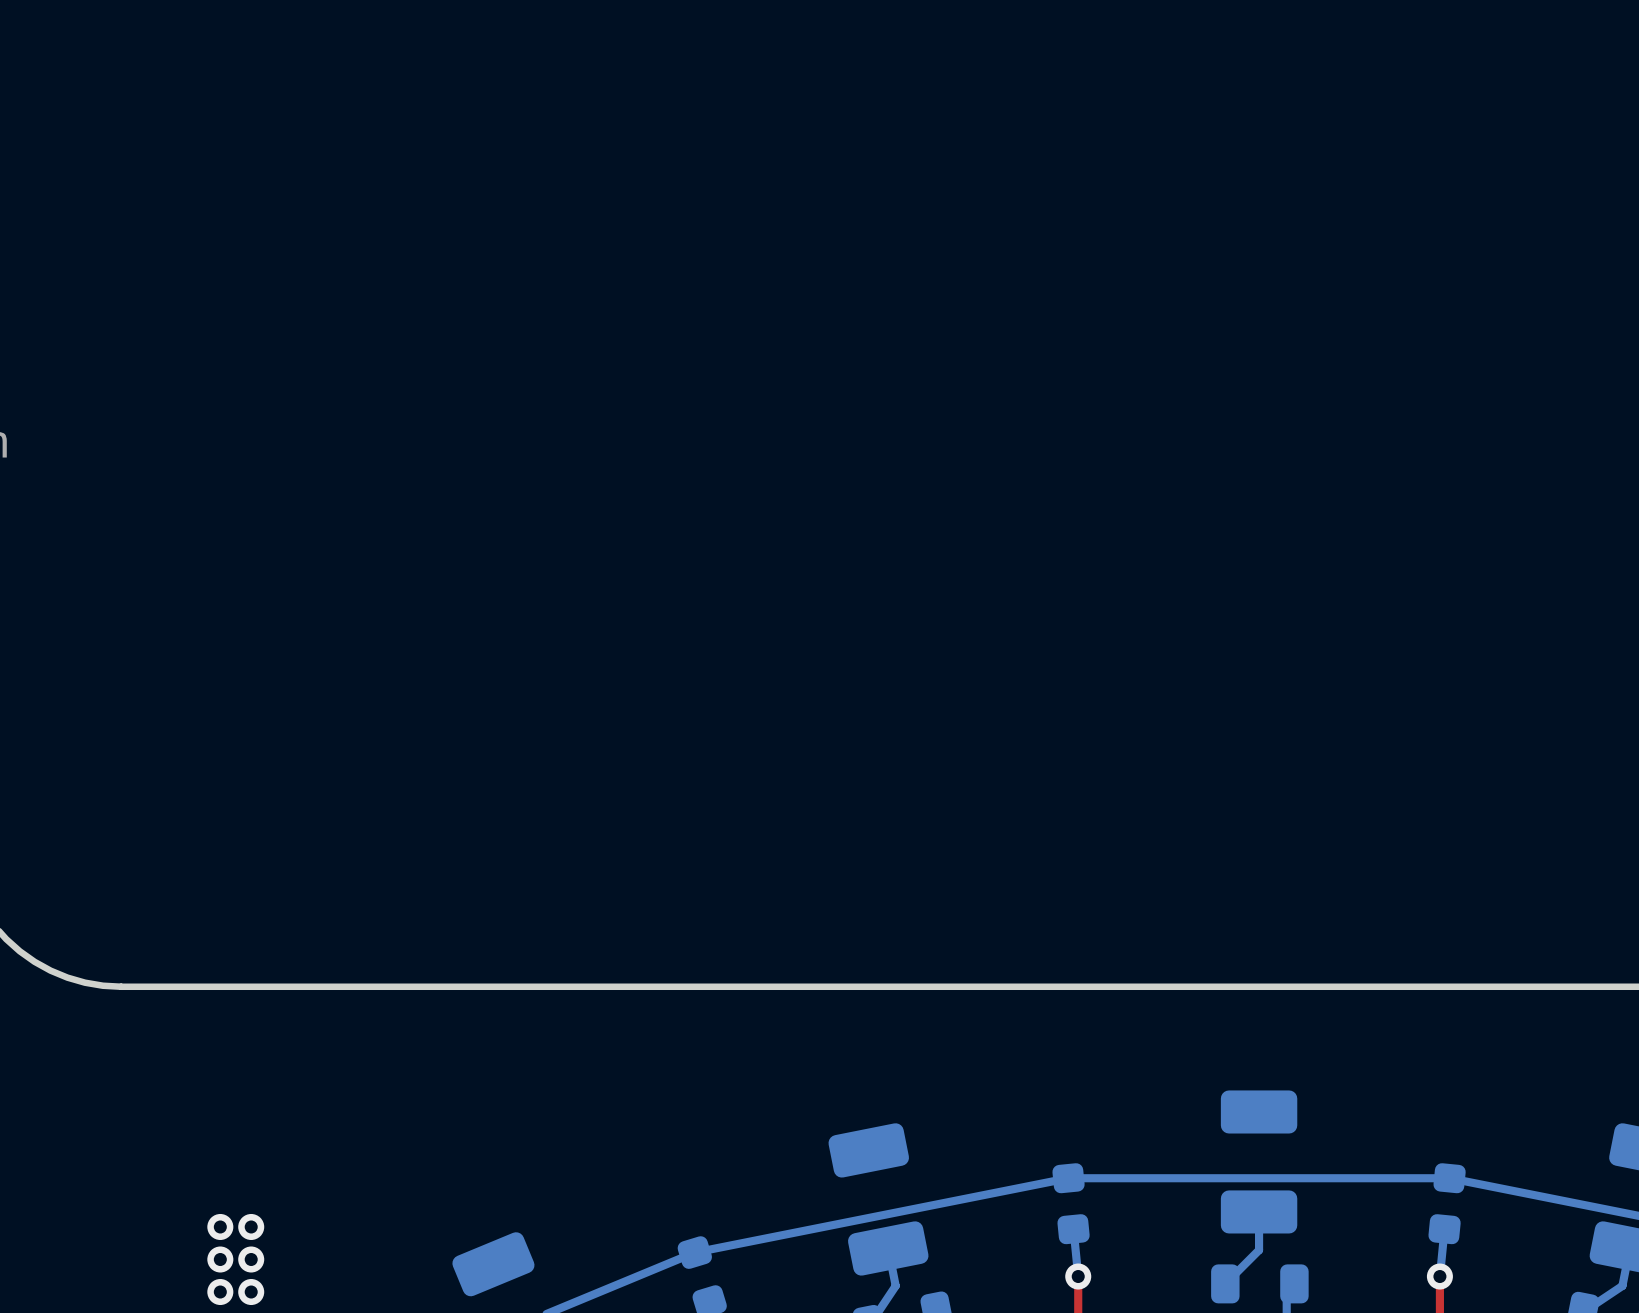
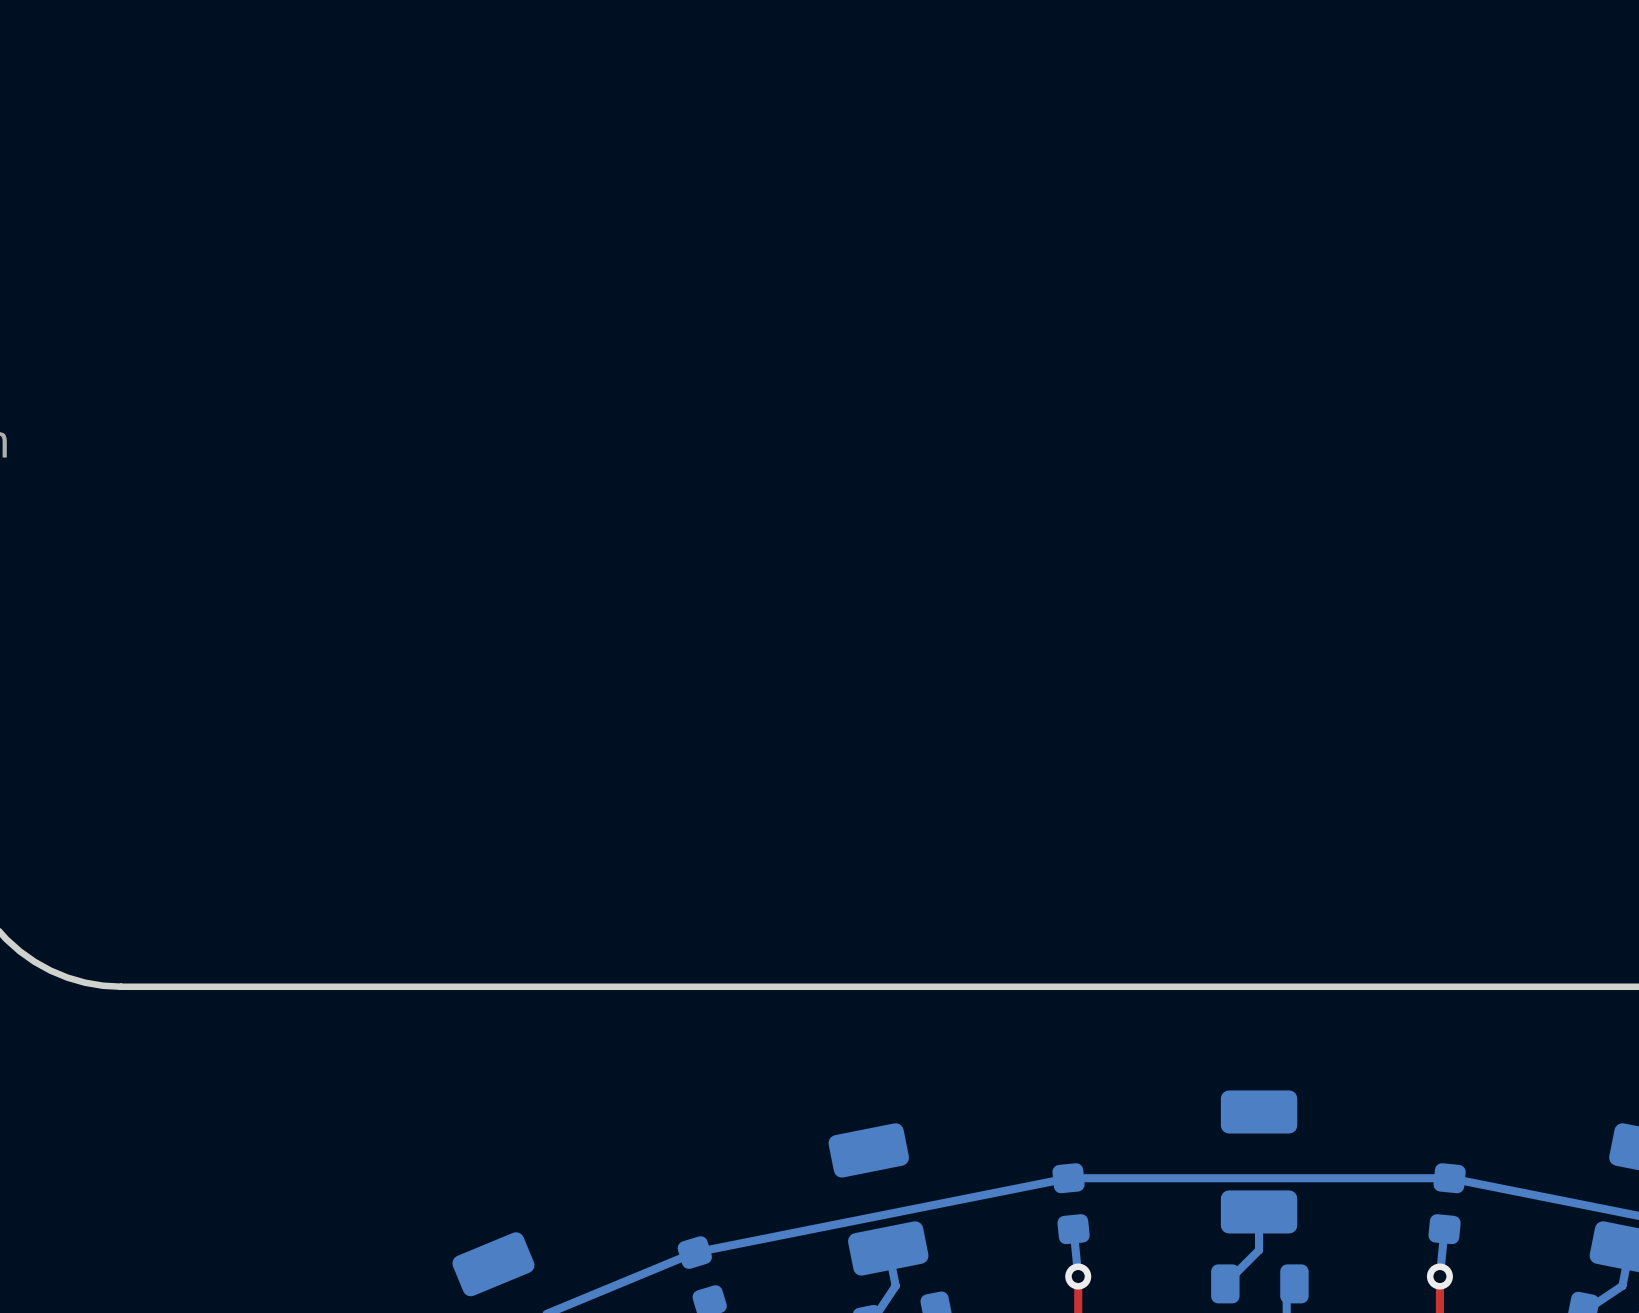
via: (220, 1226) -> none
via: (251, 1226) -> none
via: (220, 1259) -> none
via: (251, 1259) -> none
via: (220, 1292) -> none
via: (251, 1292) -> none

